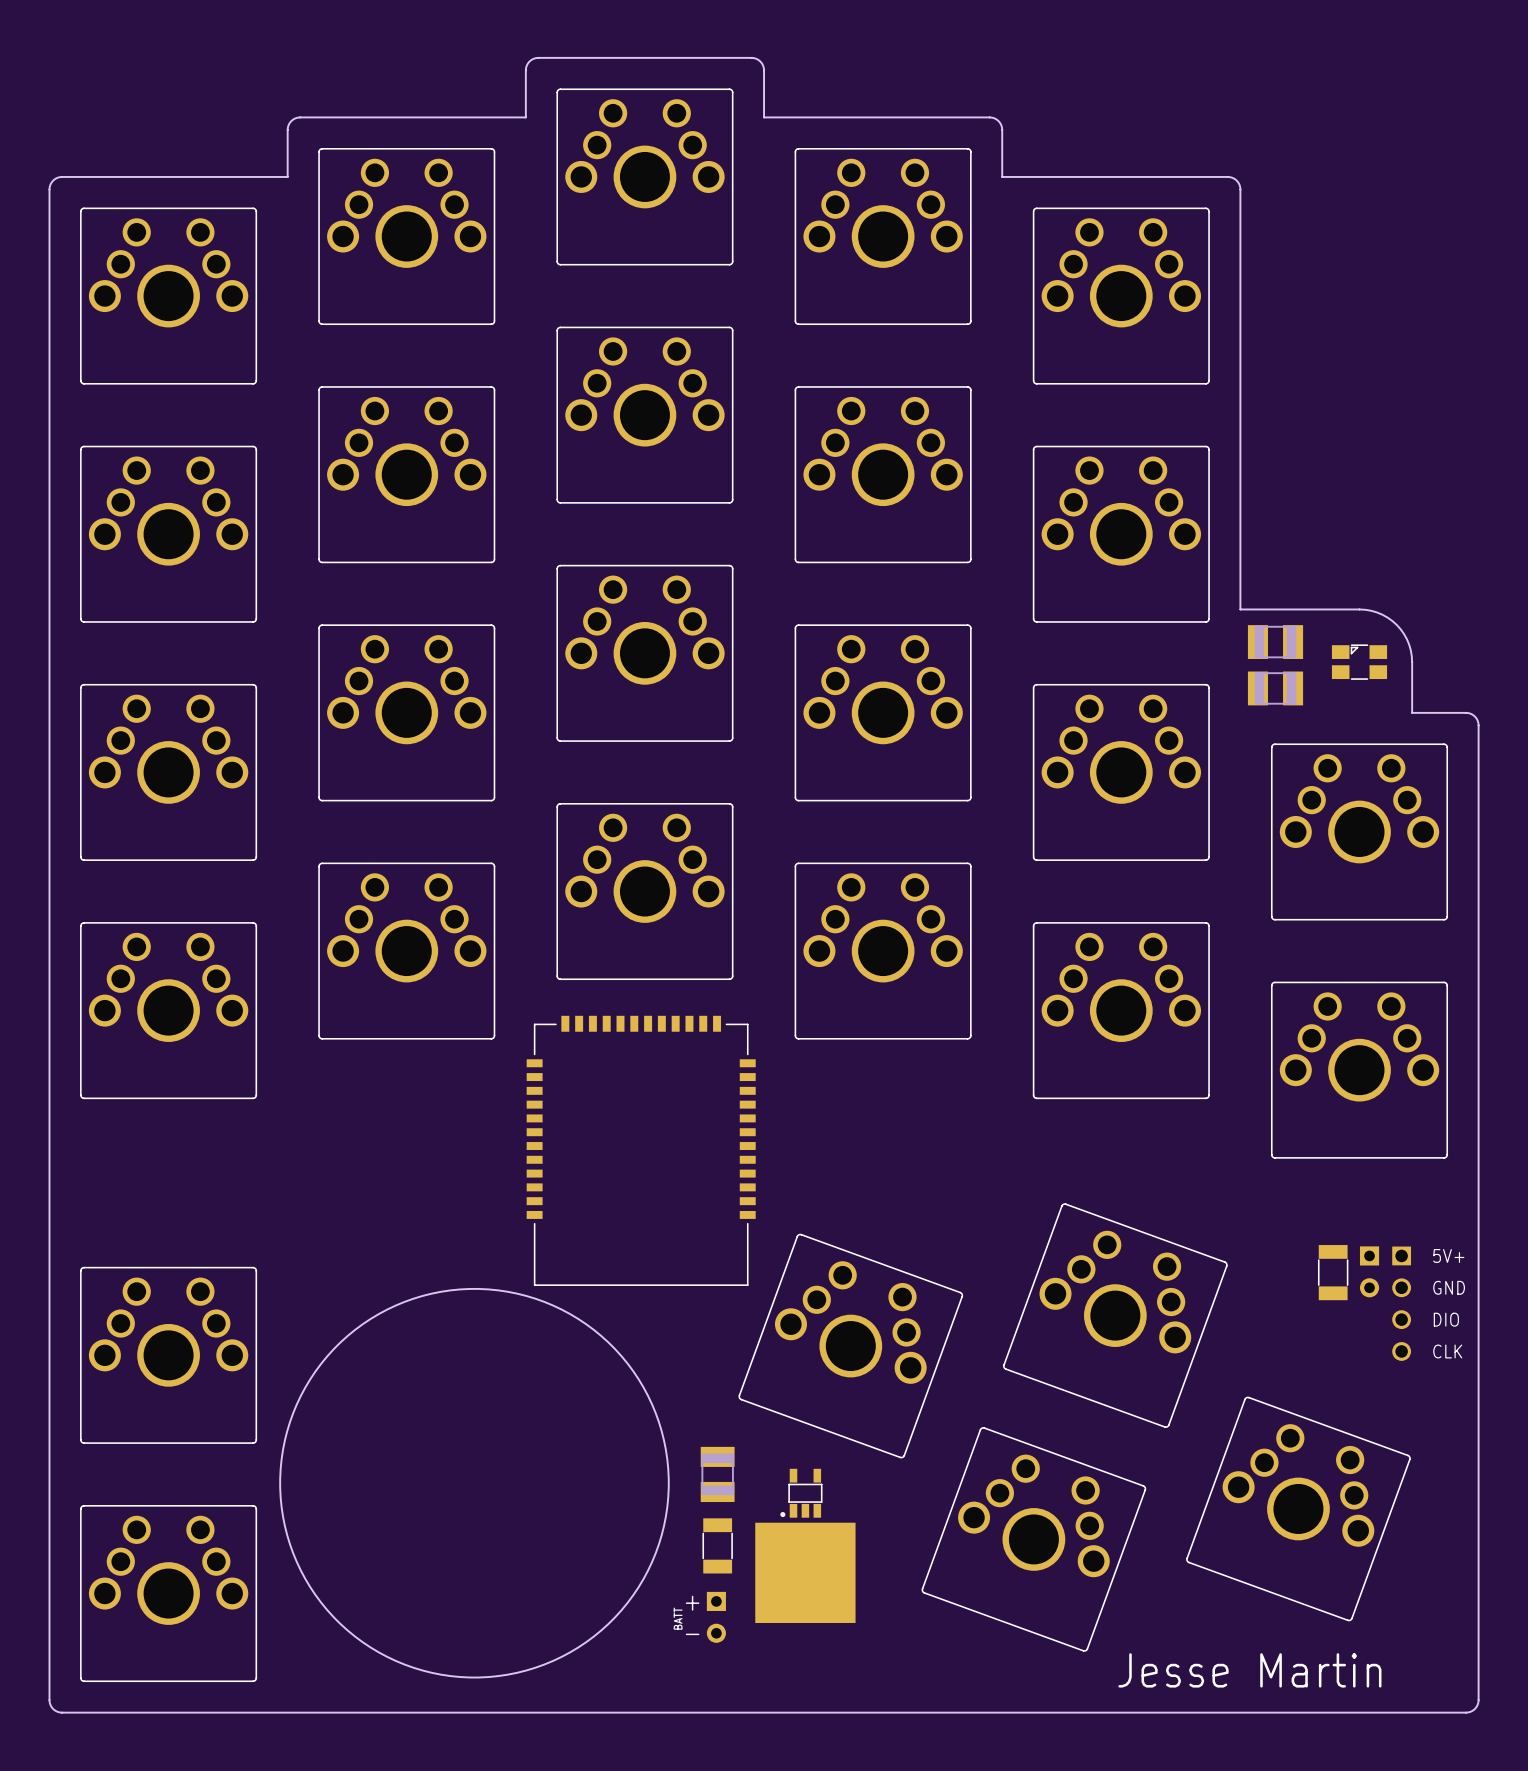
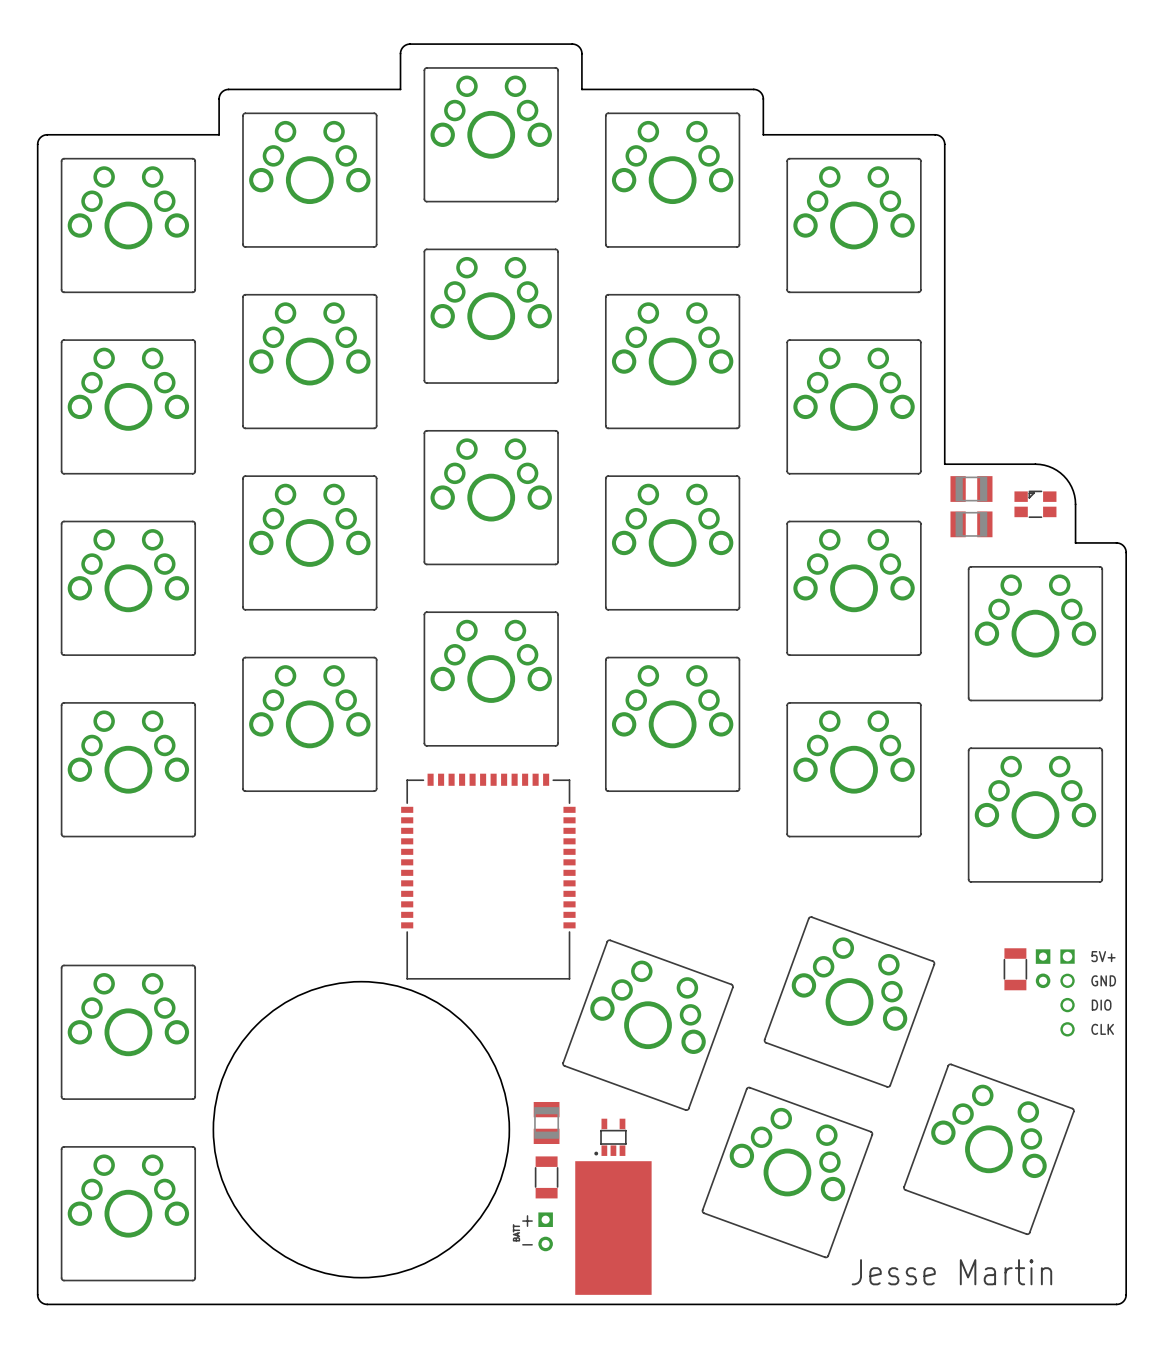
part: (805, 1545) -> none
part: none -> (613, 1206)

